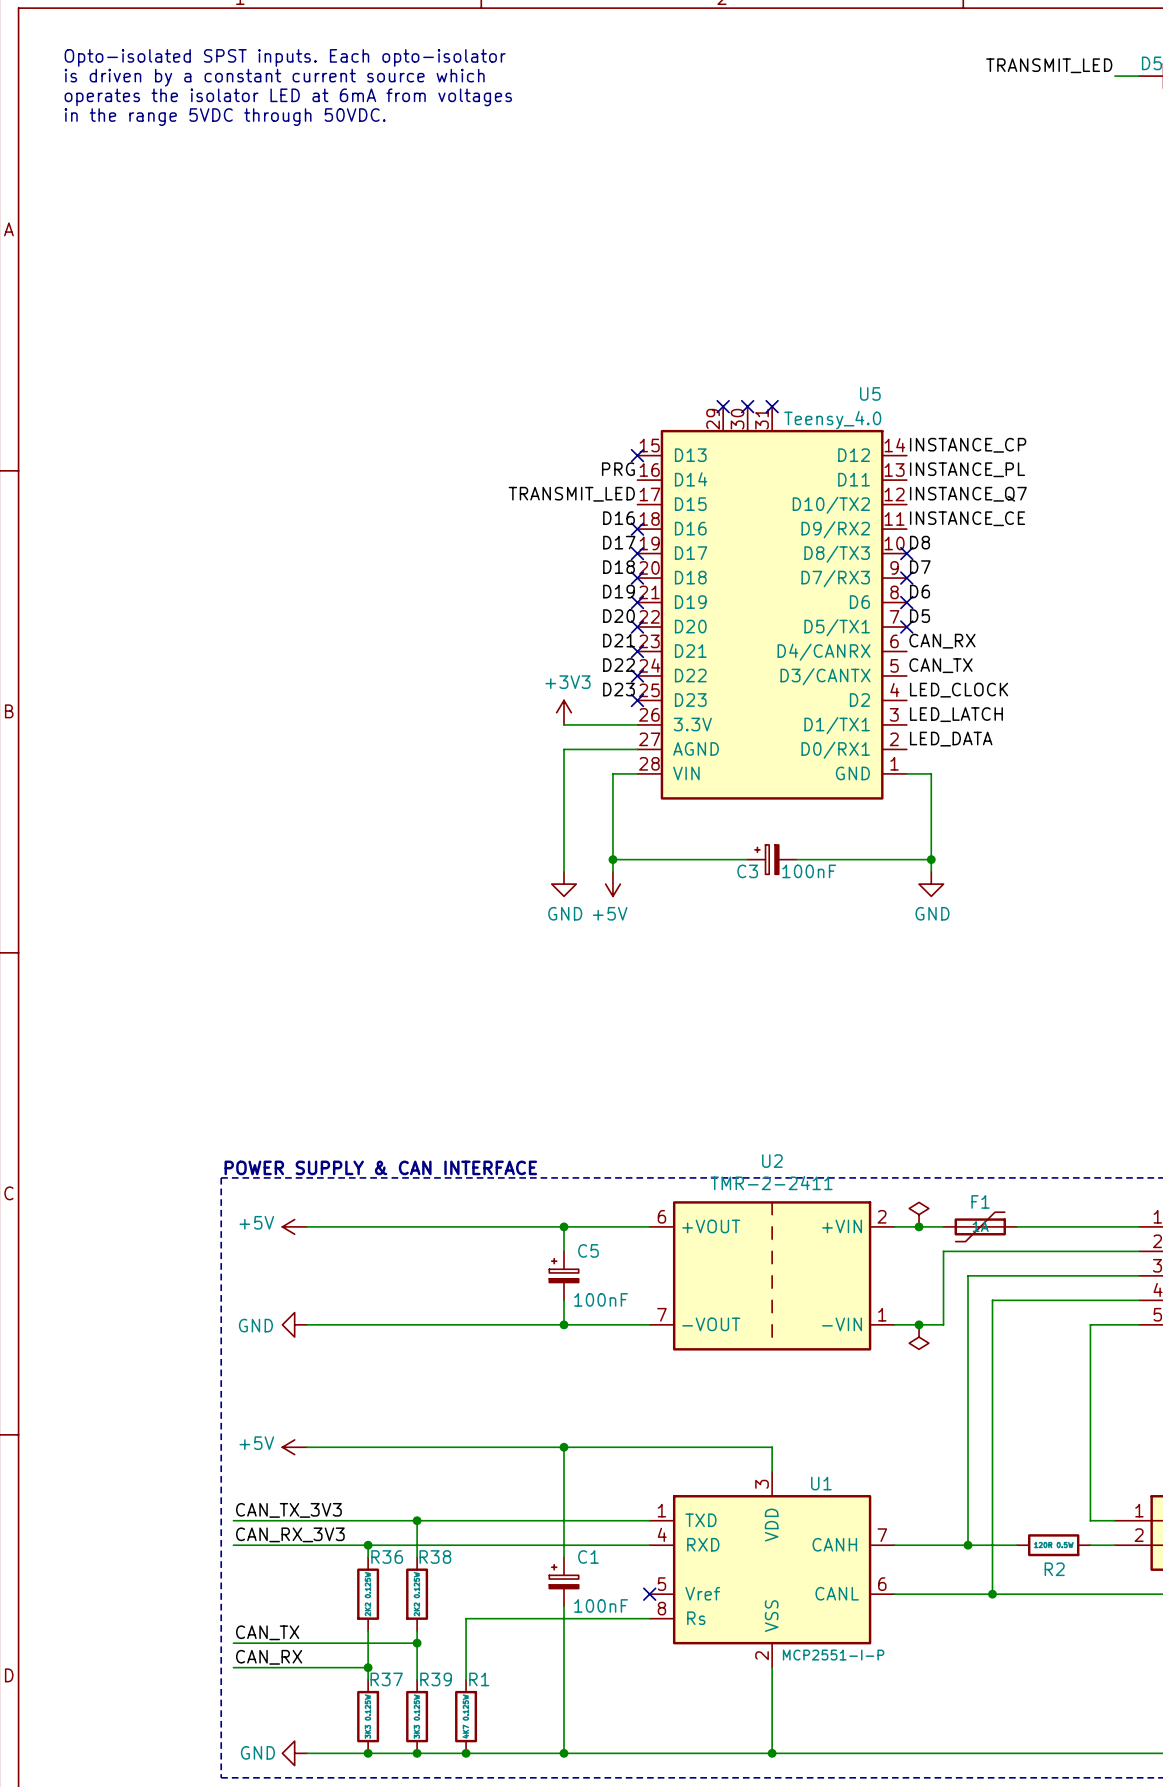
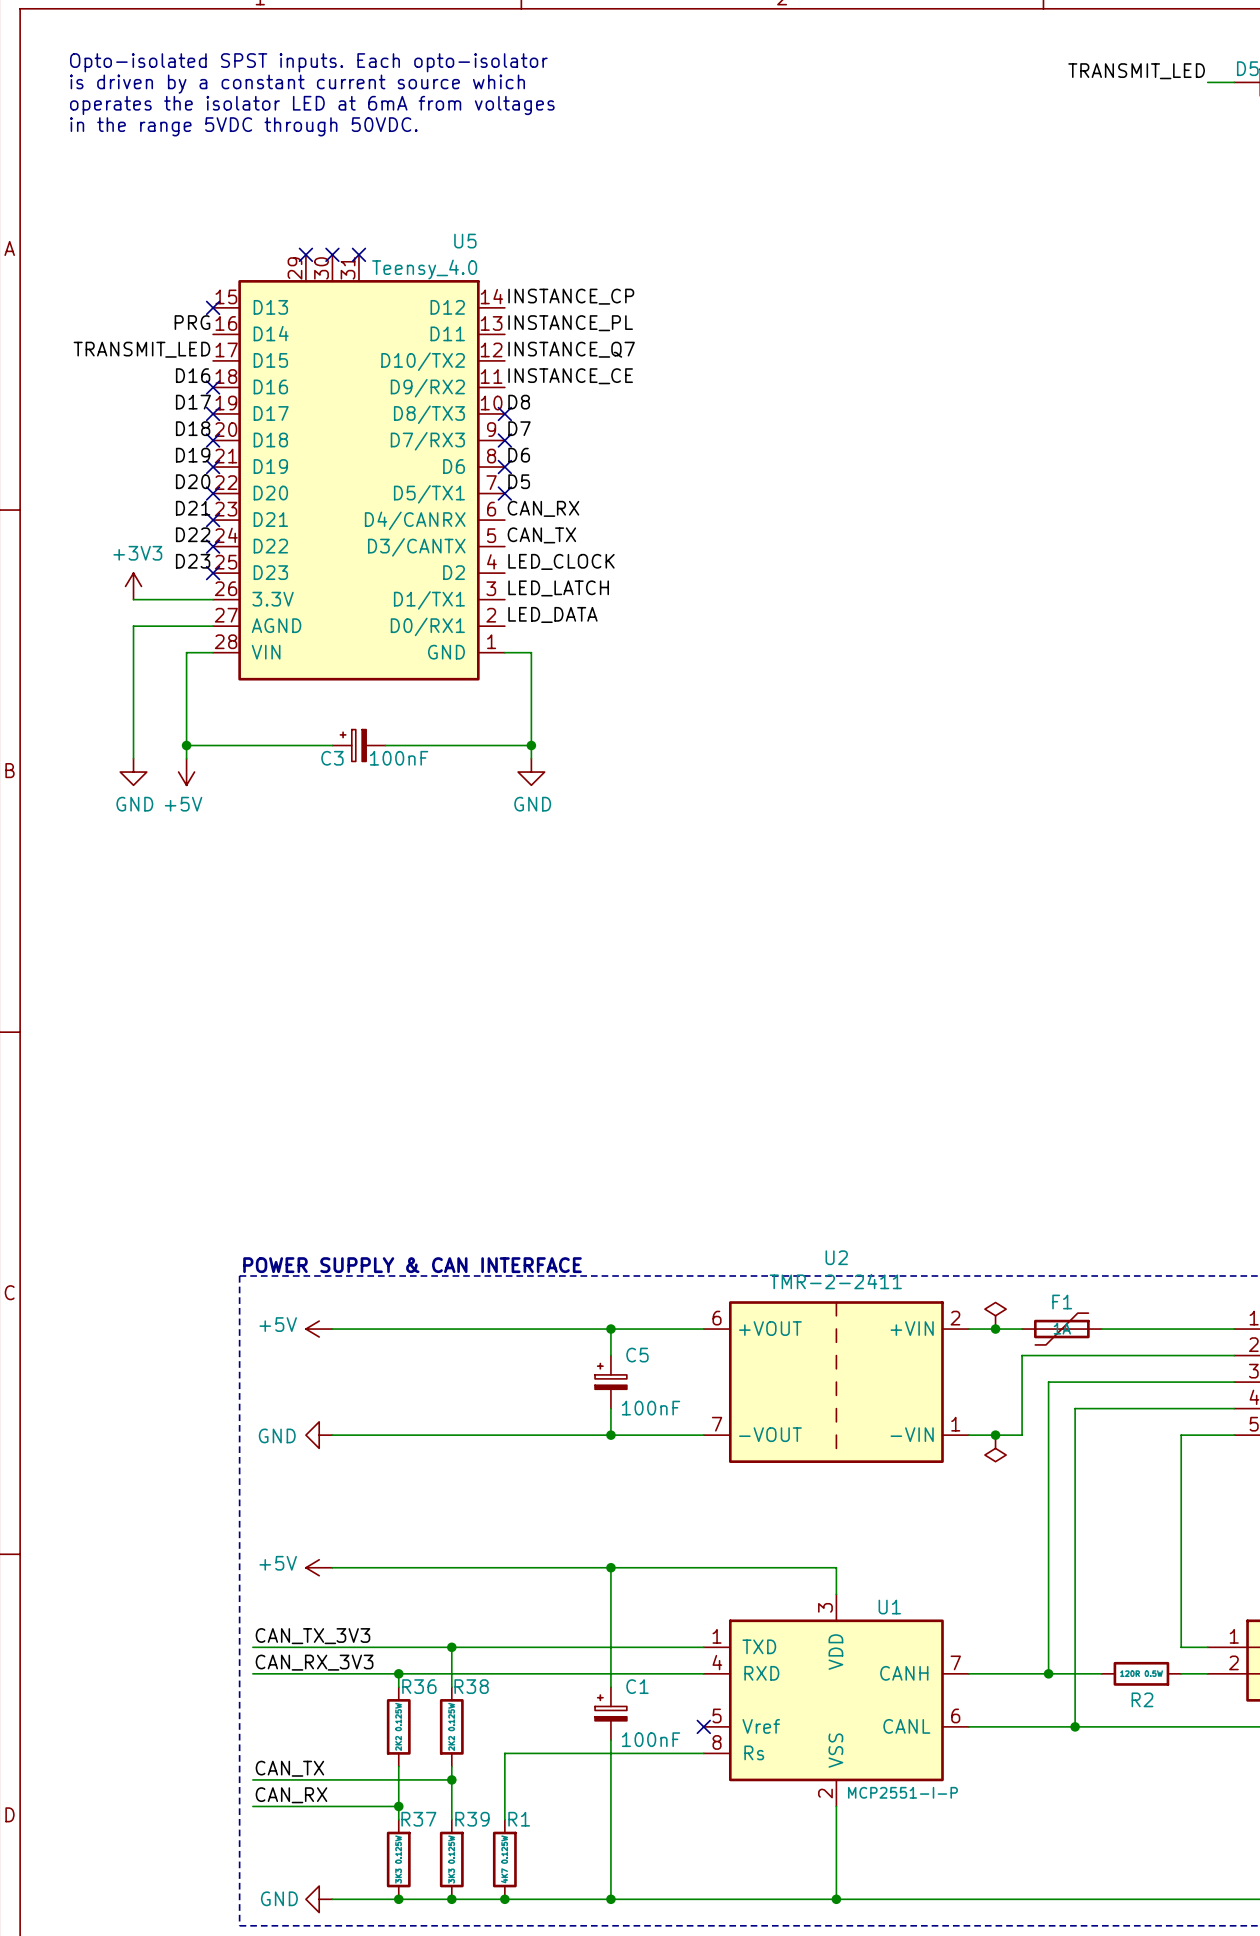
no-connect mark: none -> (305, 254)
no-connect mark: none -> (332, 254)
no-connect mark: none -> (358, 254)
label: none -> INSTANCE_CP (571, 296)
no-connect mark: none -> (213, 307)
label: none -> PRG (192, 322)
label: none -> INSTANCE_PL (570, 323)
label: none -> TRANSMIT_LED (141, 349)
label: none -> INSTANCE_Q7 (571, 349)
label: none -> D16 (193, 375)
label: none -> INSTANCE_CE (570, 376)
no-connect mark: none -> (213, 387)
label: none -> D17 (193, 402)
label: none -> D8 (519, 402)
no-connect mark: none -> (213, 413)
no-connect mark: none -> (504, 413)
label: none -> D18 (193, 428)
label: none -> D7 (519, 428)
no-connect mark: none -> (213, 440)
no-connect mark: none -> (504, 440)
no-connect mark: (723, 406) -> none
no-connect mark: (747, 406) -> none
no-connect mark: (772, 406) -> none
label: none -> D19 (193, 455)
label: none -> D6 (519, 455)
no-connect mark: none -> (213, 467)
no-connect mark: none -> (504, 467)
label: none -> D20 (193, 481)
label: none -> D5 (519, 481)
label: INSTANCE_CP (968, 445) -> none
no-connect mark: none -> (213, 493)
no-connect mark: none -> (504, 493)
no-connect mark: (637, 455) -> none
label: none -> D21 (193, 508)
label: none -> CAN_RX (543, 508)
label: PRG (618, 469) -> none
label: INSTANCE_PL (967, 469) -> none
no-connect mark: none -> (213, 520)
label: none -> D22 (193, 534)
label: none -> CAN_TX (541, 535)
label: TRANSMIT_LED (571, 494) -> none
label: INSTANCE_Q7 (968, 494) -> none
no-connect mark: none -> (213, 546)
label: none -> D23 (193, 561)
label: none -> LED_CLOCK (561, 561)
label: D16 (619, 518) -> none
label: INSTANCE_CE (967, 518) -> none
no-connect mark: none -> (213, 573)
no-connect mark: (637, 529) -> none
power symbol: none -> +3V3 (133, 586)
label: D17 (619, 542) -> none
label: D8 (920, 542) -> none
label: none -> LED_LATCH (558, 588)
wire: none -> (133, 599) (213, 599)
no-connect mark: (637, 553) -> none
no-connect mark: (906, 553) -> none
label: none -> LED_DATA (552, 614)
label: D18 (619, 567) -> none
label: D7 (920, 567) -> none
wire: none -> (213, 626) (133, 626) (133, 758)
no-connect mark: (637, 578) -> none
no-connect mark: (906, 578) -> none
label: D19 (619, 591) -> none
label: D6 (920, 591) -> none
wire: none -> (213, 652) (186, 652) (186, 758)
wire: none -> (504, 652) (531, 652) (531, 758)
no-connect mark: (637, 602) -> none
no-connect mark: (906, 602) -> none
U5 position: (772, 603) -> (358, 467)
label: D20 (619, 616) -> none
label: D5 (920, 616) -> none
no-connect mark: (637, 627) -> none
no-connect mark: (906, 627) -> none
label: D21 (619, 640) -> none
label: CAN_RX (942, 641) -> none
no-connect mark: (637, 651) -> none
label: D22 (619, 665) -> none
label: CAN_TX (940, 665) -> none
no-connect mark: (637, 675) -> none
wire: none -> (186, 745) (332, 745)
junction: none -> (186, 745)
wire: none -> (385, 745) (531, 745)
junction: none -> (531, 745)
label: D23 (619, 689) -> none
label: LED_CLOCK (959, 690) -> none
no-connect mark: (637, 700) -> none
power symbol: none -> GND (133, 772)
power symbol: none -> +5V (186, 772)
power symbol: +3V3 (564, 712) -> none
label: LED_LATCH (956, 714) -> none
wire: (564, 724) (637, 724) -> none
label: LED_DATA (951, 739) -> none
wire: (637, 749) (564, 749) (564, 871) -> none
wire: (637, 773) (612, 773) (612, 871) -> none
wire: (906, 773) (931, 773) (931, 871) -> none
wire: (612, 859) (747, 859) -> none
junction: (612, 859) -> none
C3 position: (772, 859) -> (358, 745)
wire: (796, 859) (931, 859) -> none
junction: (931, 859) -> none
power symbol position: GND (564, 884) -> GND (531, 772)
power symbol: +5V (612, 884) -> none
power symbol: GND (931, 884) -> none

